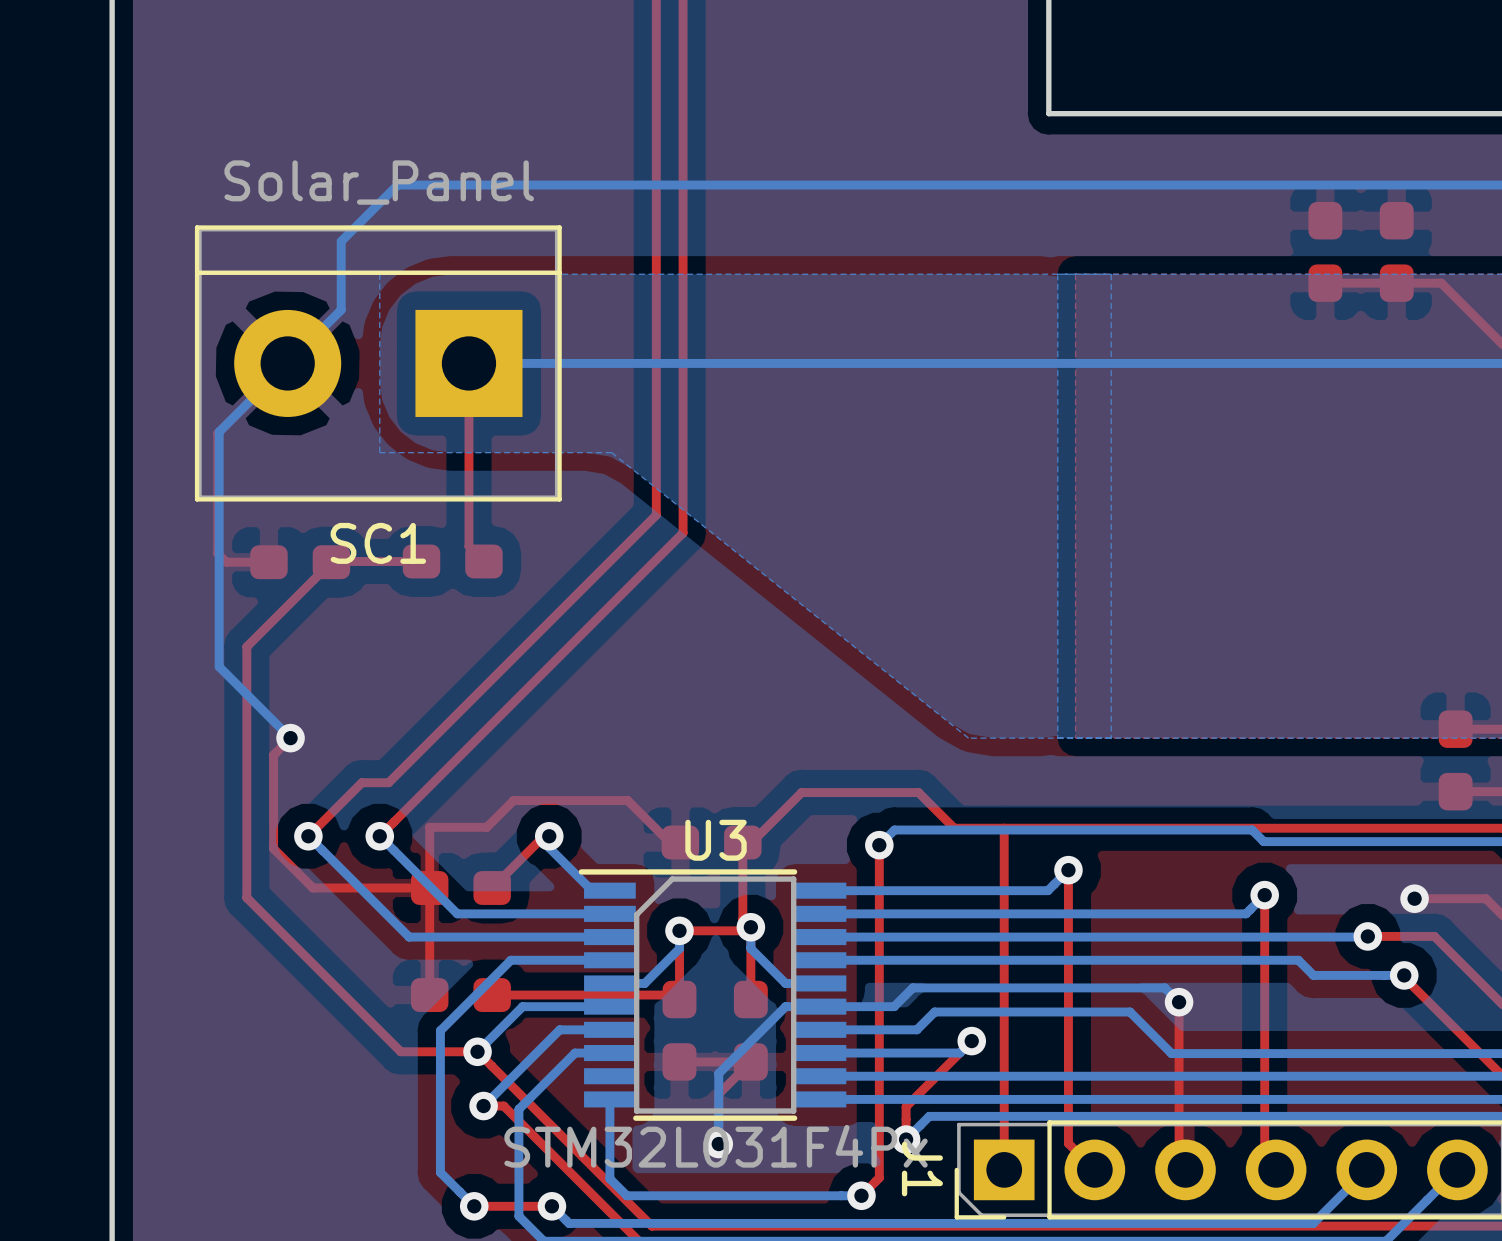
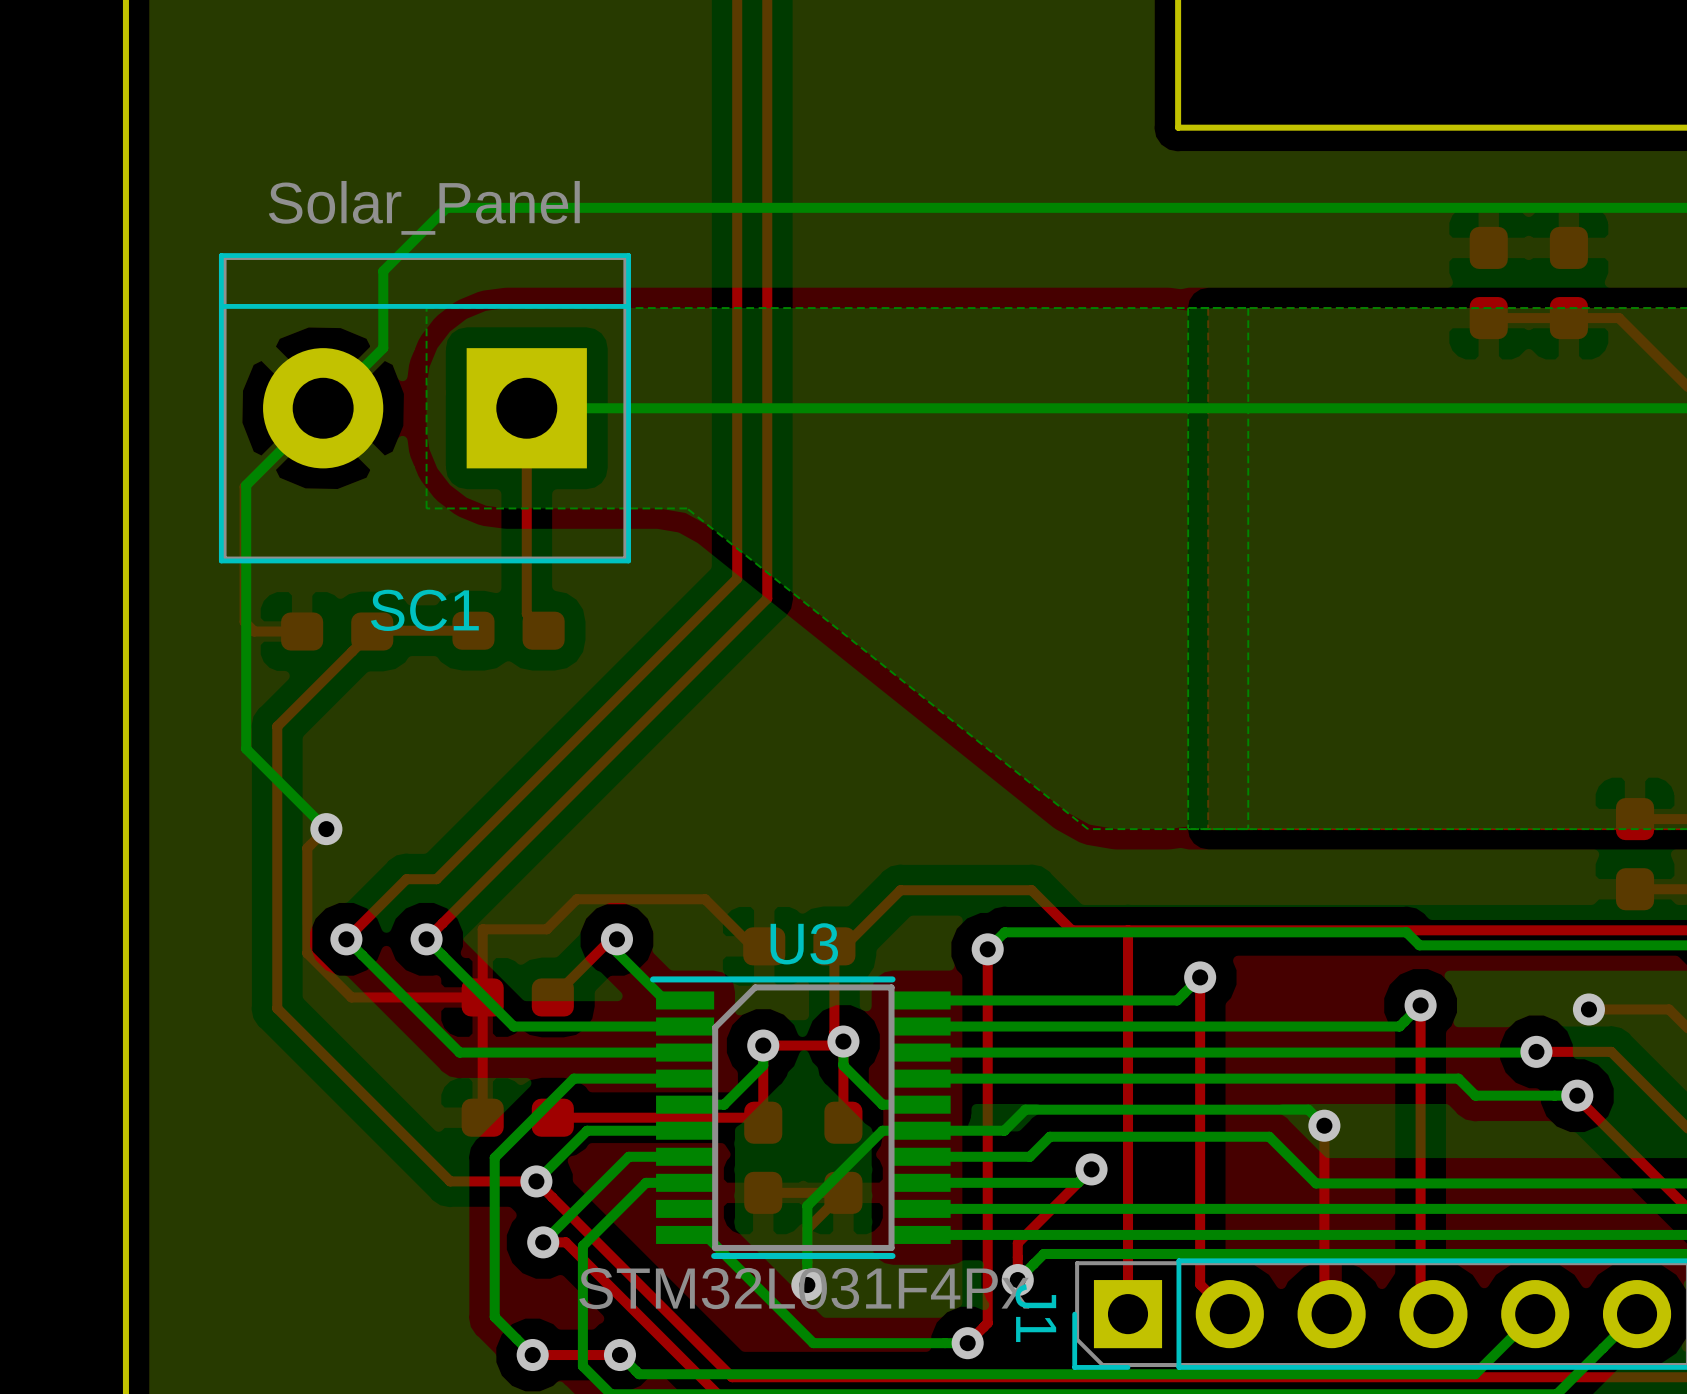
bottom track: (609, 1099) (609, 1178) (626, 1195) (724, 1195) -> (685, 1234) (705, 1234) (813, 1343)

